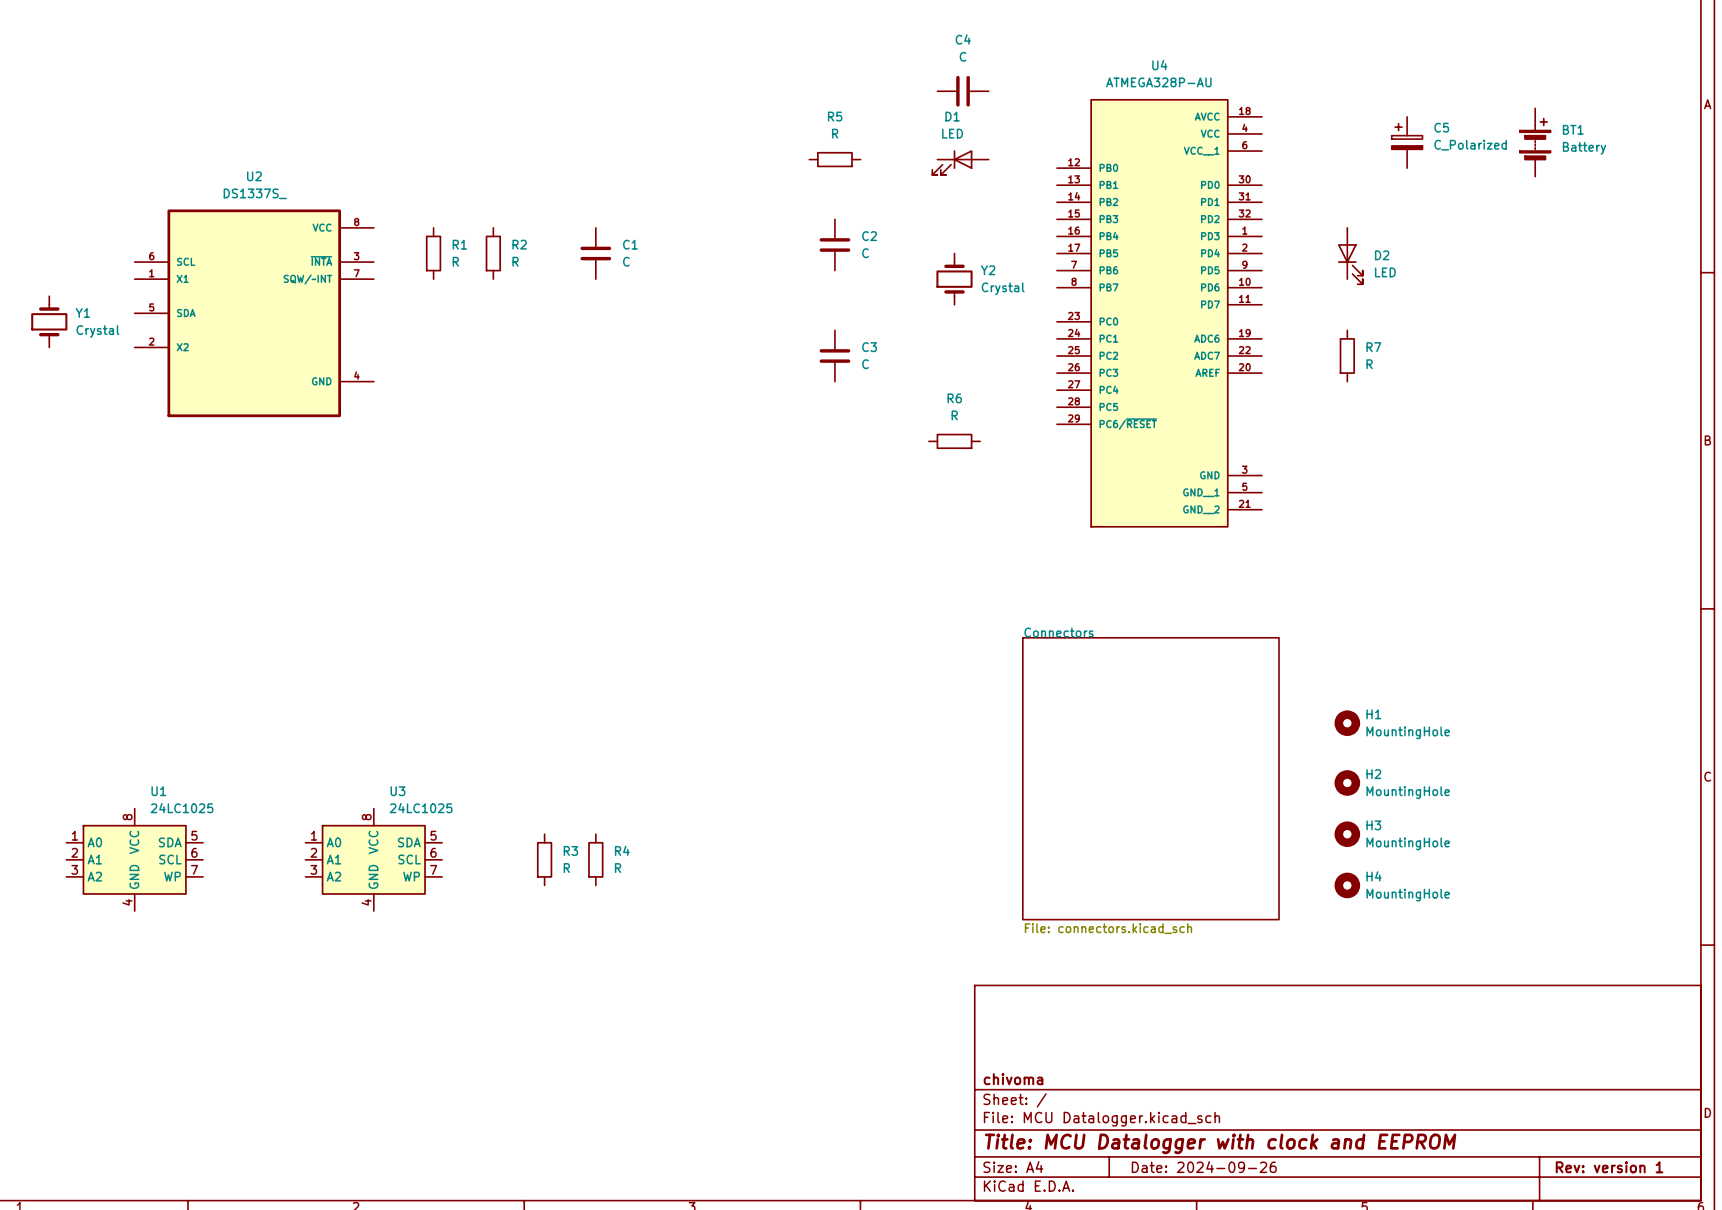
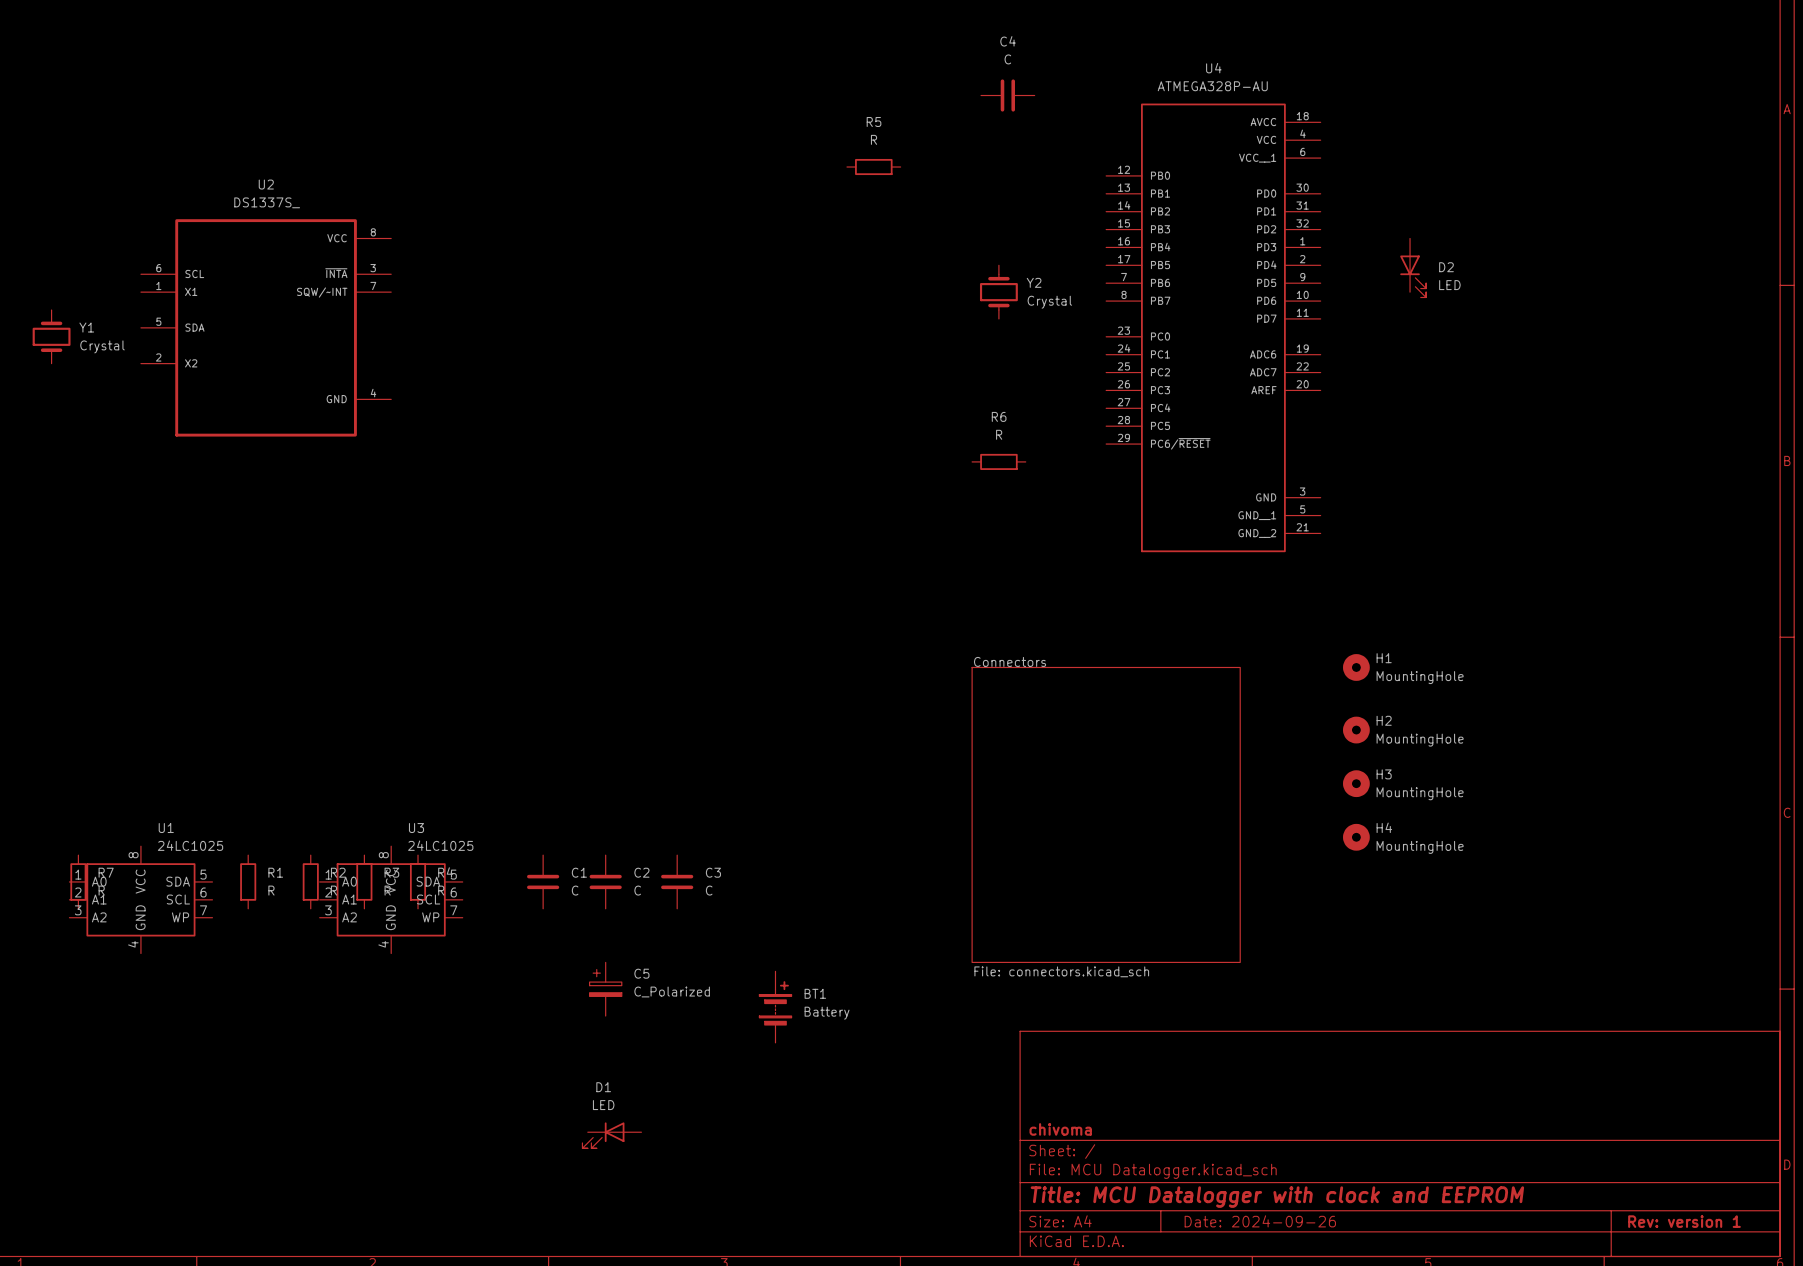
C5 position: (1407, 142) -> (605, 989)
BT1 position: (1535, 142) -> (775, 1007)
D1 position: (960, 162) -> (611, 1135)
C2 position: (834, 244) -> (605, 881)
R1 position: (433, 253) -> (248, 881)
R2 position: (493, 253) -> (310, 881)
C1 position: (595, 253) -> (543, 881)
C3 position: (834, 355) -> (677, 881)
R7 position: (1347, 355) -> (78, 881)
H1 position: (1347, 723) -> (1356, 667)
sheet Connectors position: (1150, 778) -> (1106, 814)
H2 position: (1347, 782) -> (1356, 730)
H3 position: (1347, 834) -> (1356, 783)
R3 position: (544, 859) -> (364, 881)
R4 position: (595, 859) -> (418, 881)
H4 position: (1347, 885) -> (1356, 837)

